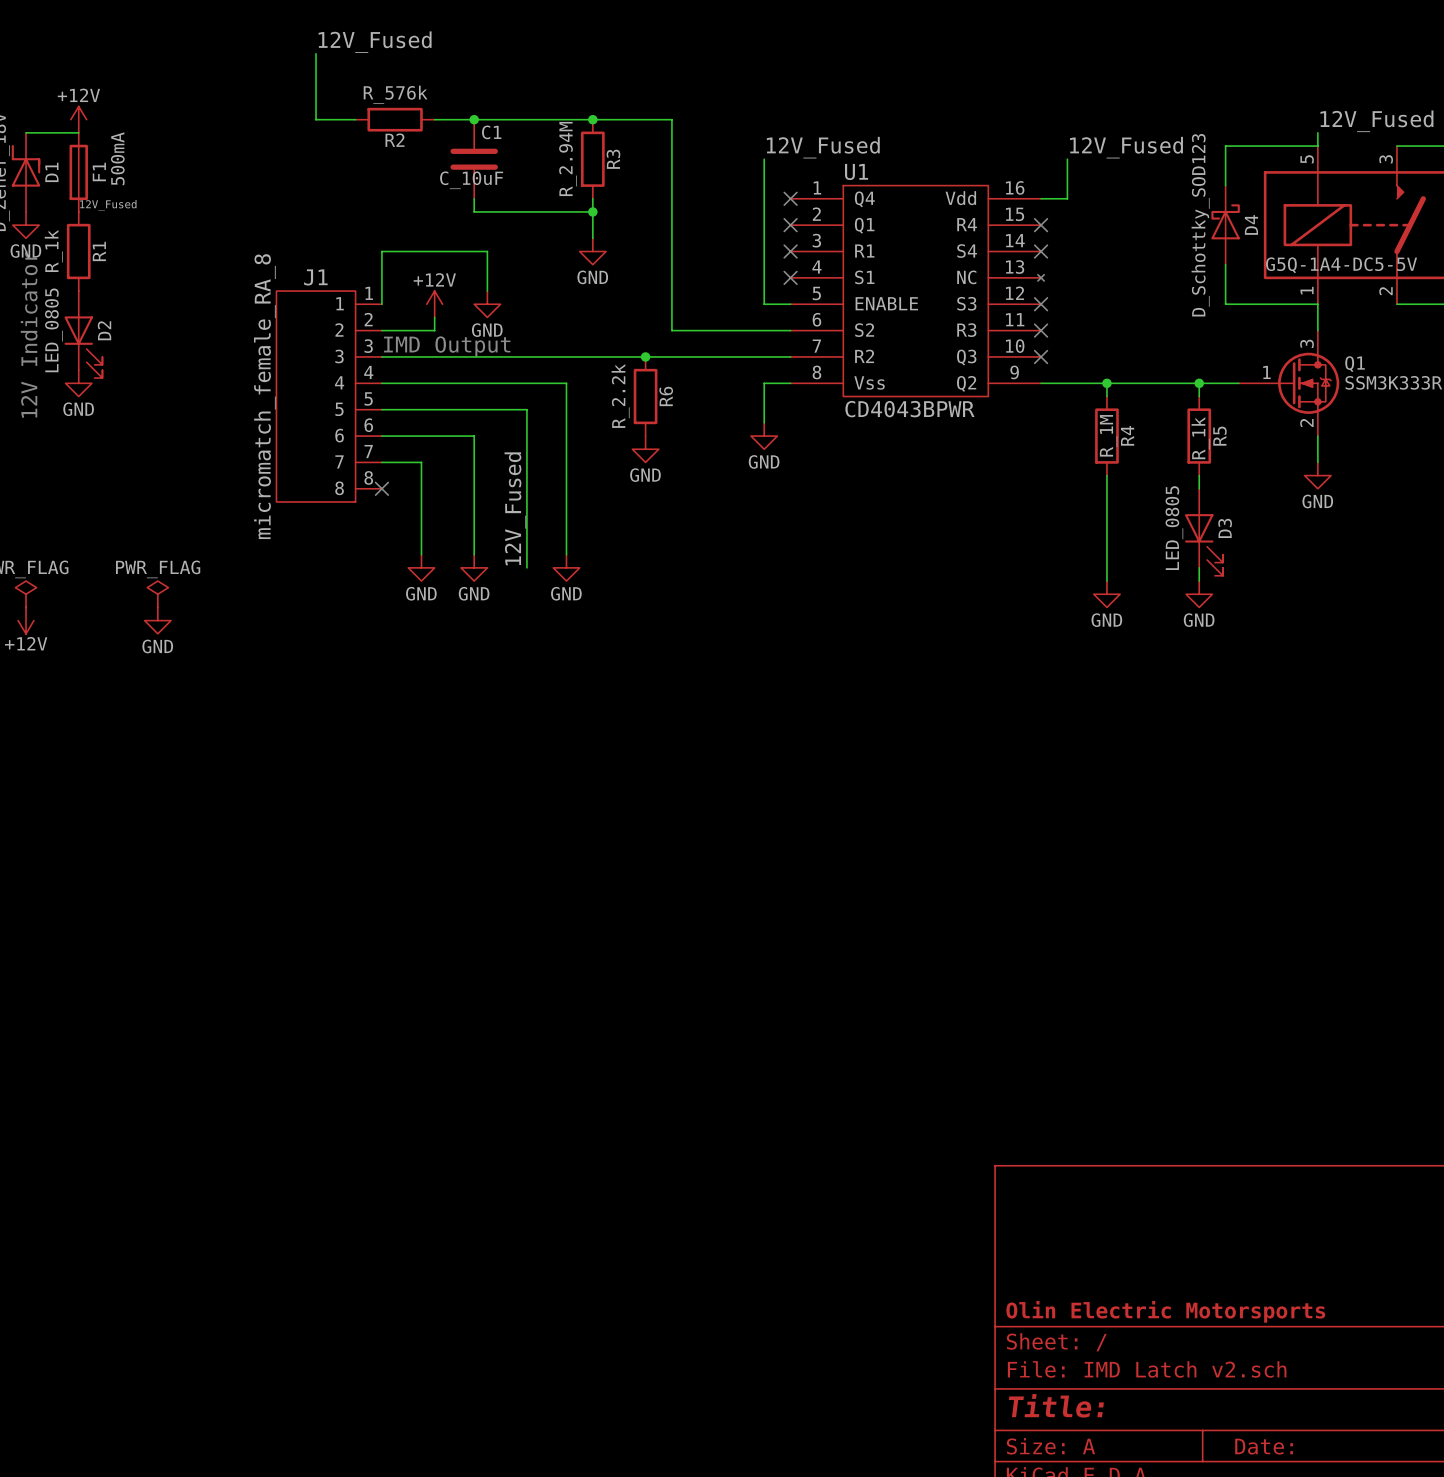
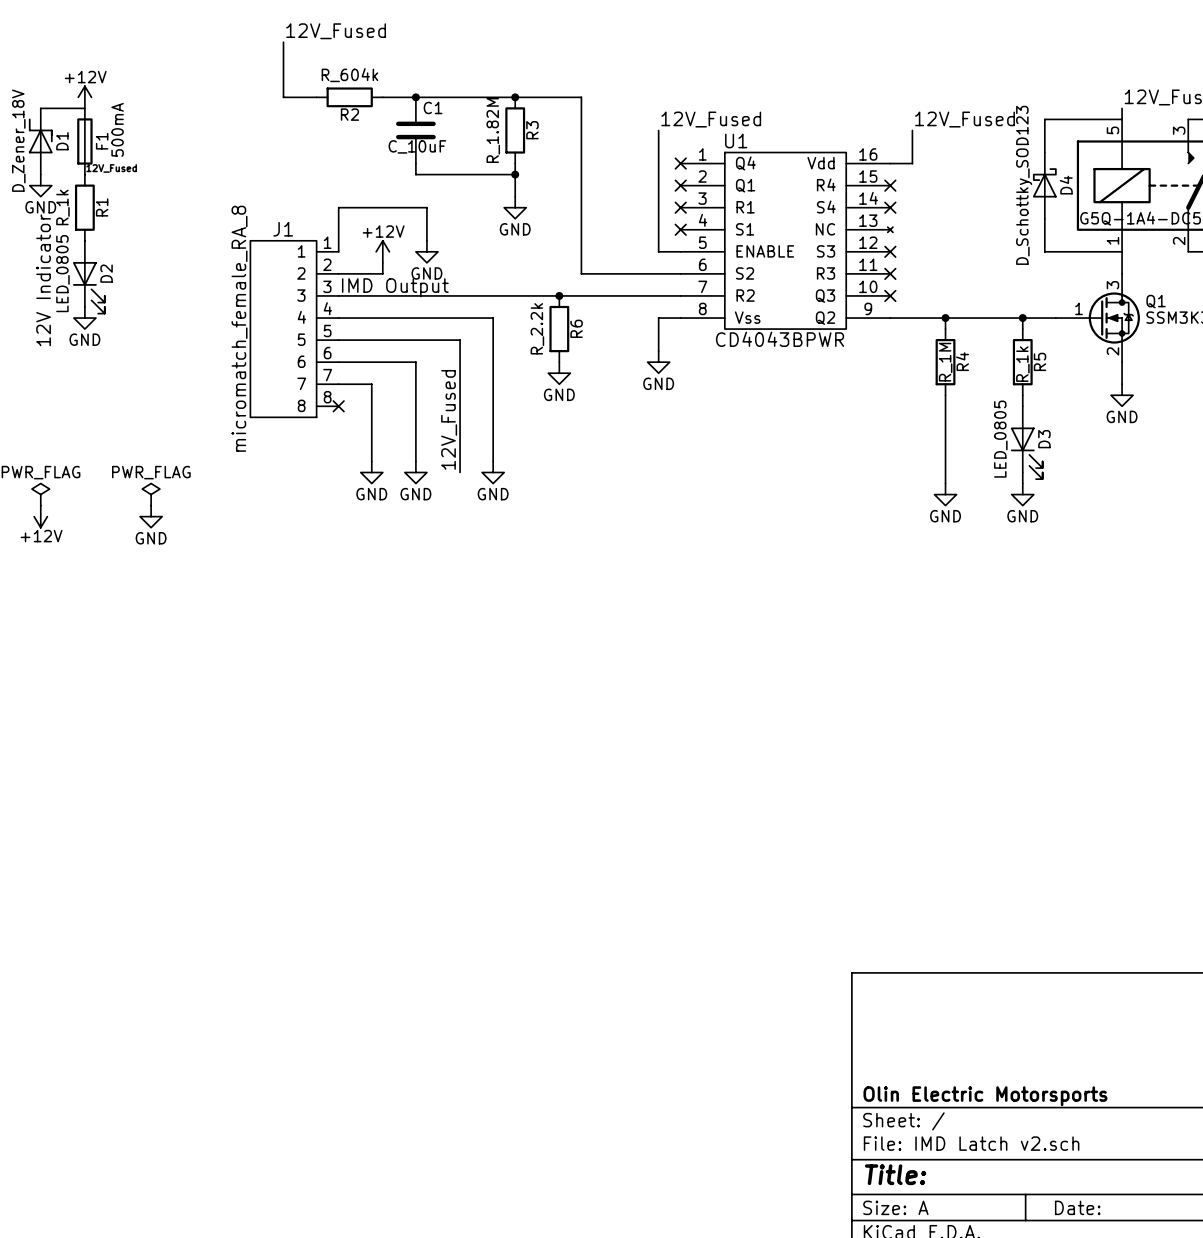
R2 value: R_576k (395, 94) -> R_604k (349, 75)
R3 value: R_2.94M (568, 158) -> R_1.82M (493, 130)

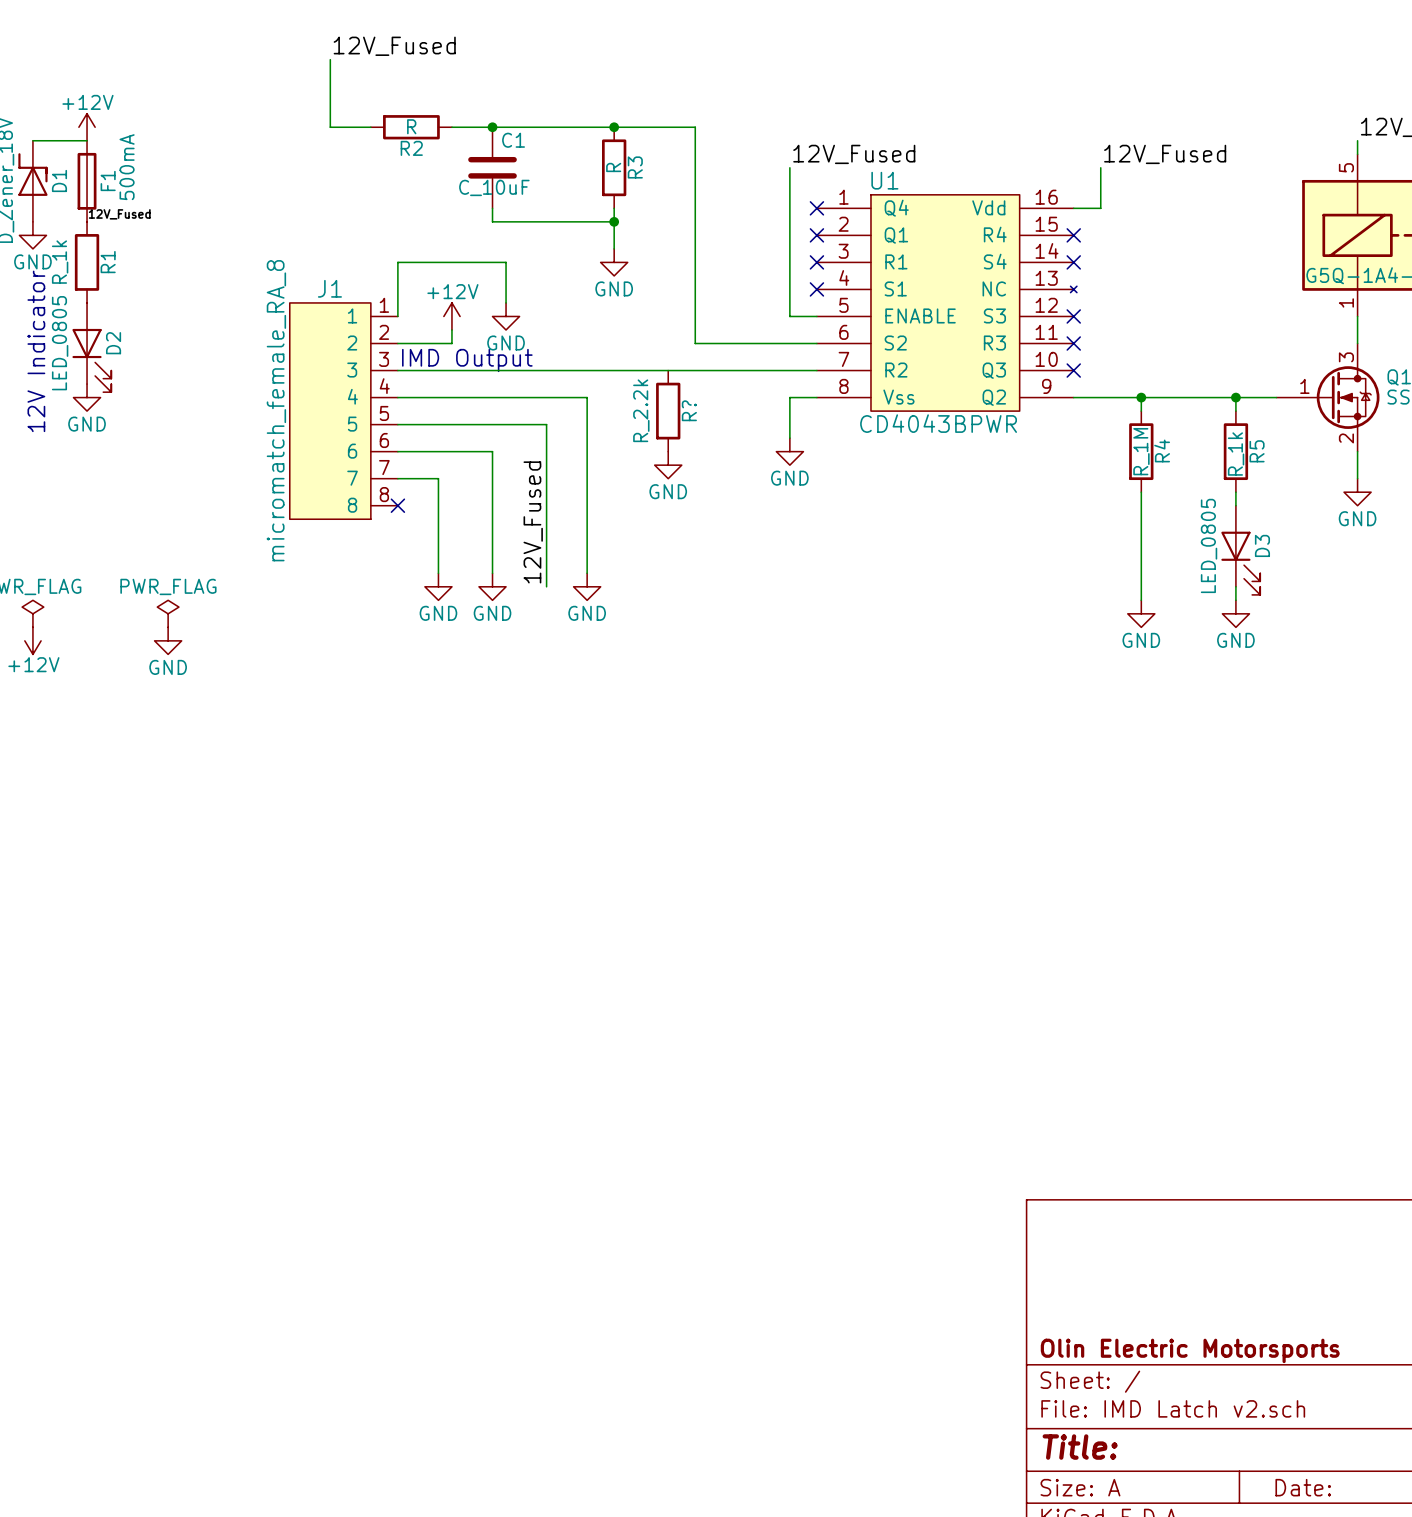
R2 value: R_604k (349, 75) -> R (411, 126)
wire: (1122, 119) (1044, 119) (1044, 152) -> none
R3 value: R_1.82M (493, 130) -> R (613, 167)
D4: D_Schottky_SOD123 (1044, 185) -> none
wire: (1044, 218) (1044, 251) (1122, 251) -> none
junction: (559, 295) -> none
R6 name: R6 (576, 328) -> R? (689, 410)

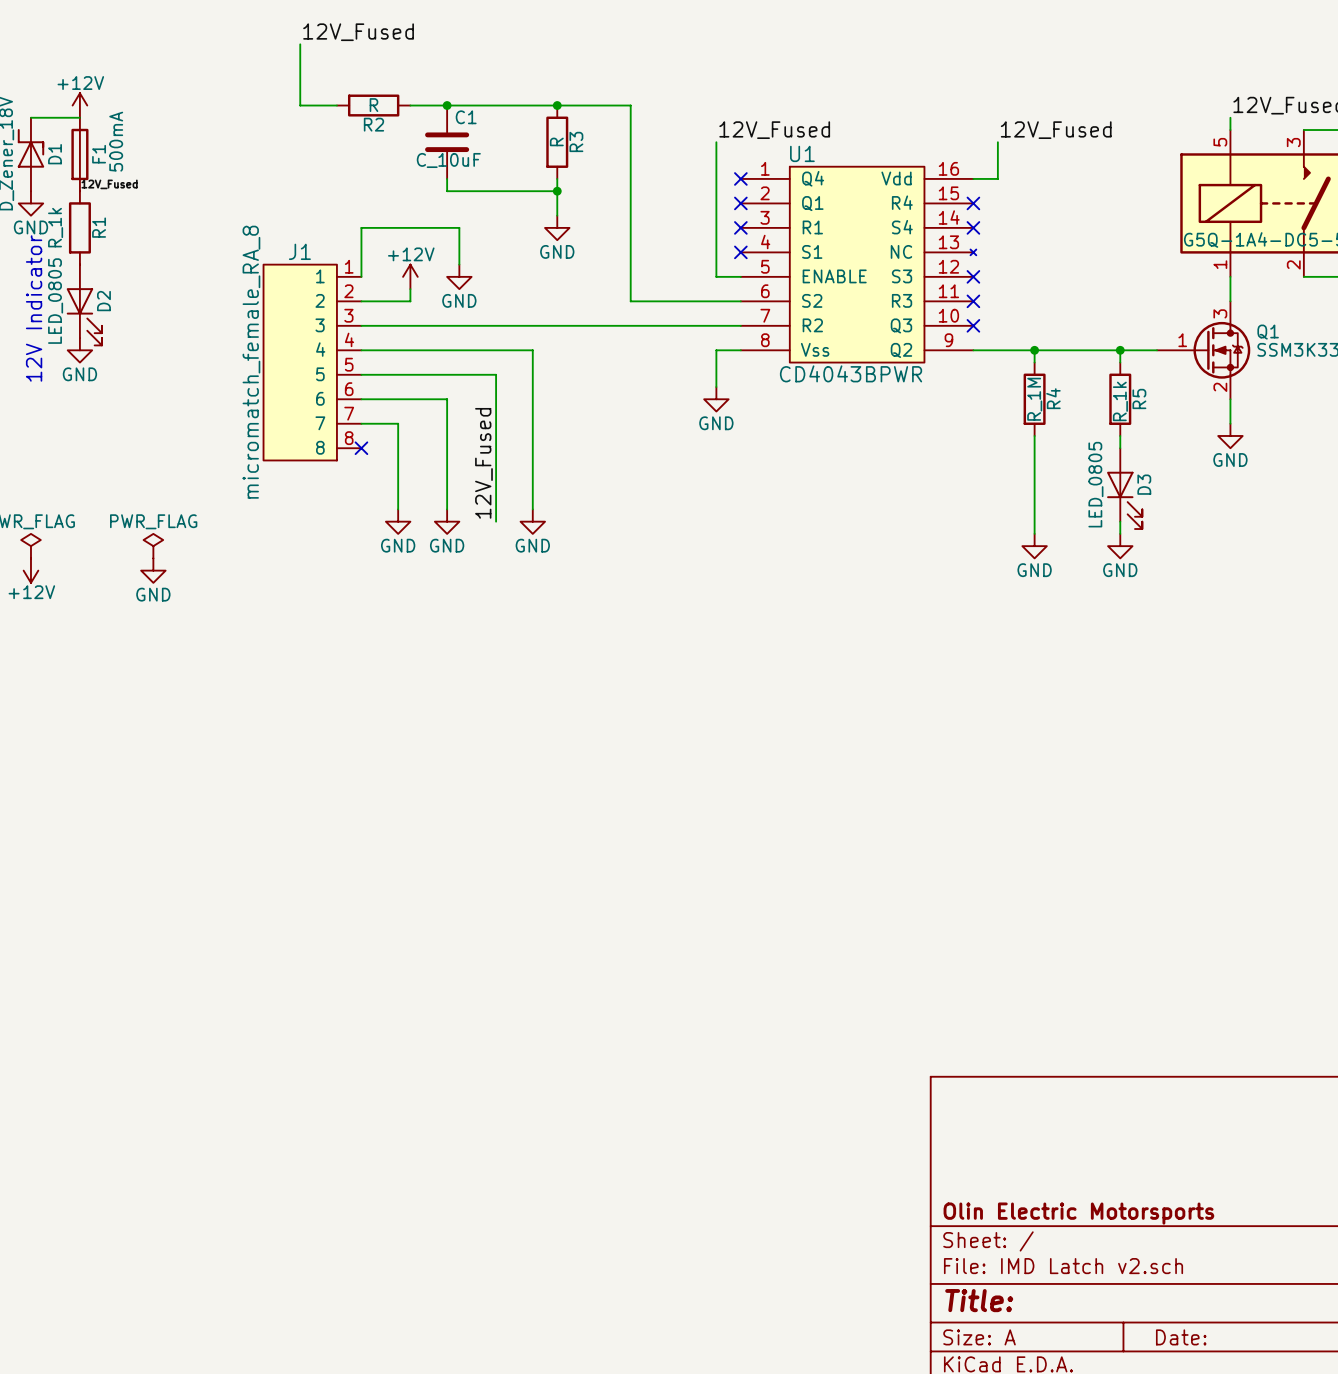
text: IMD Output (467, 360) -> none
R?: R_2.2k (668, 411) -> none
power symbol: GND (668, 465) -> none

